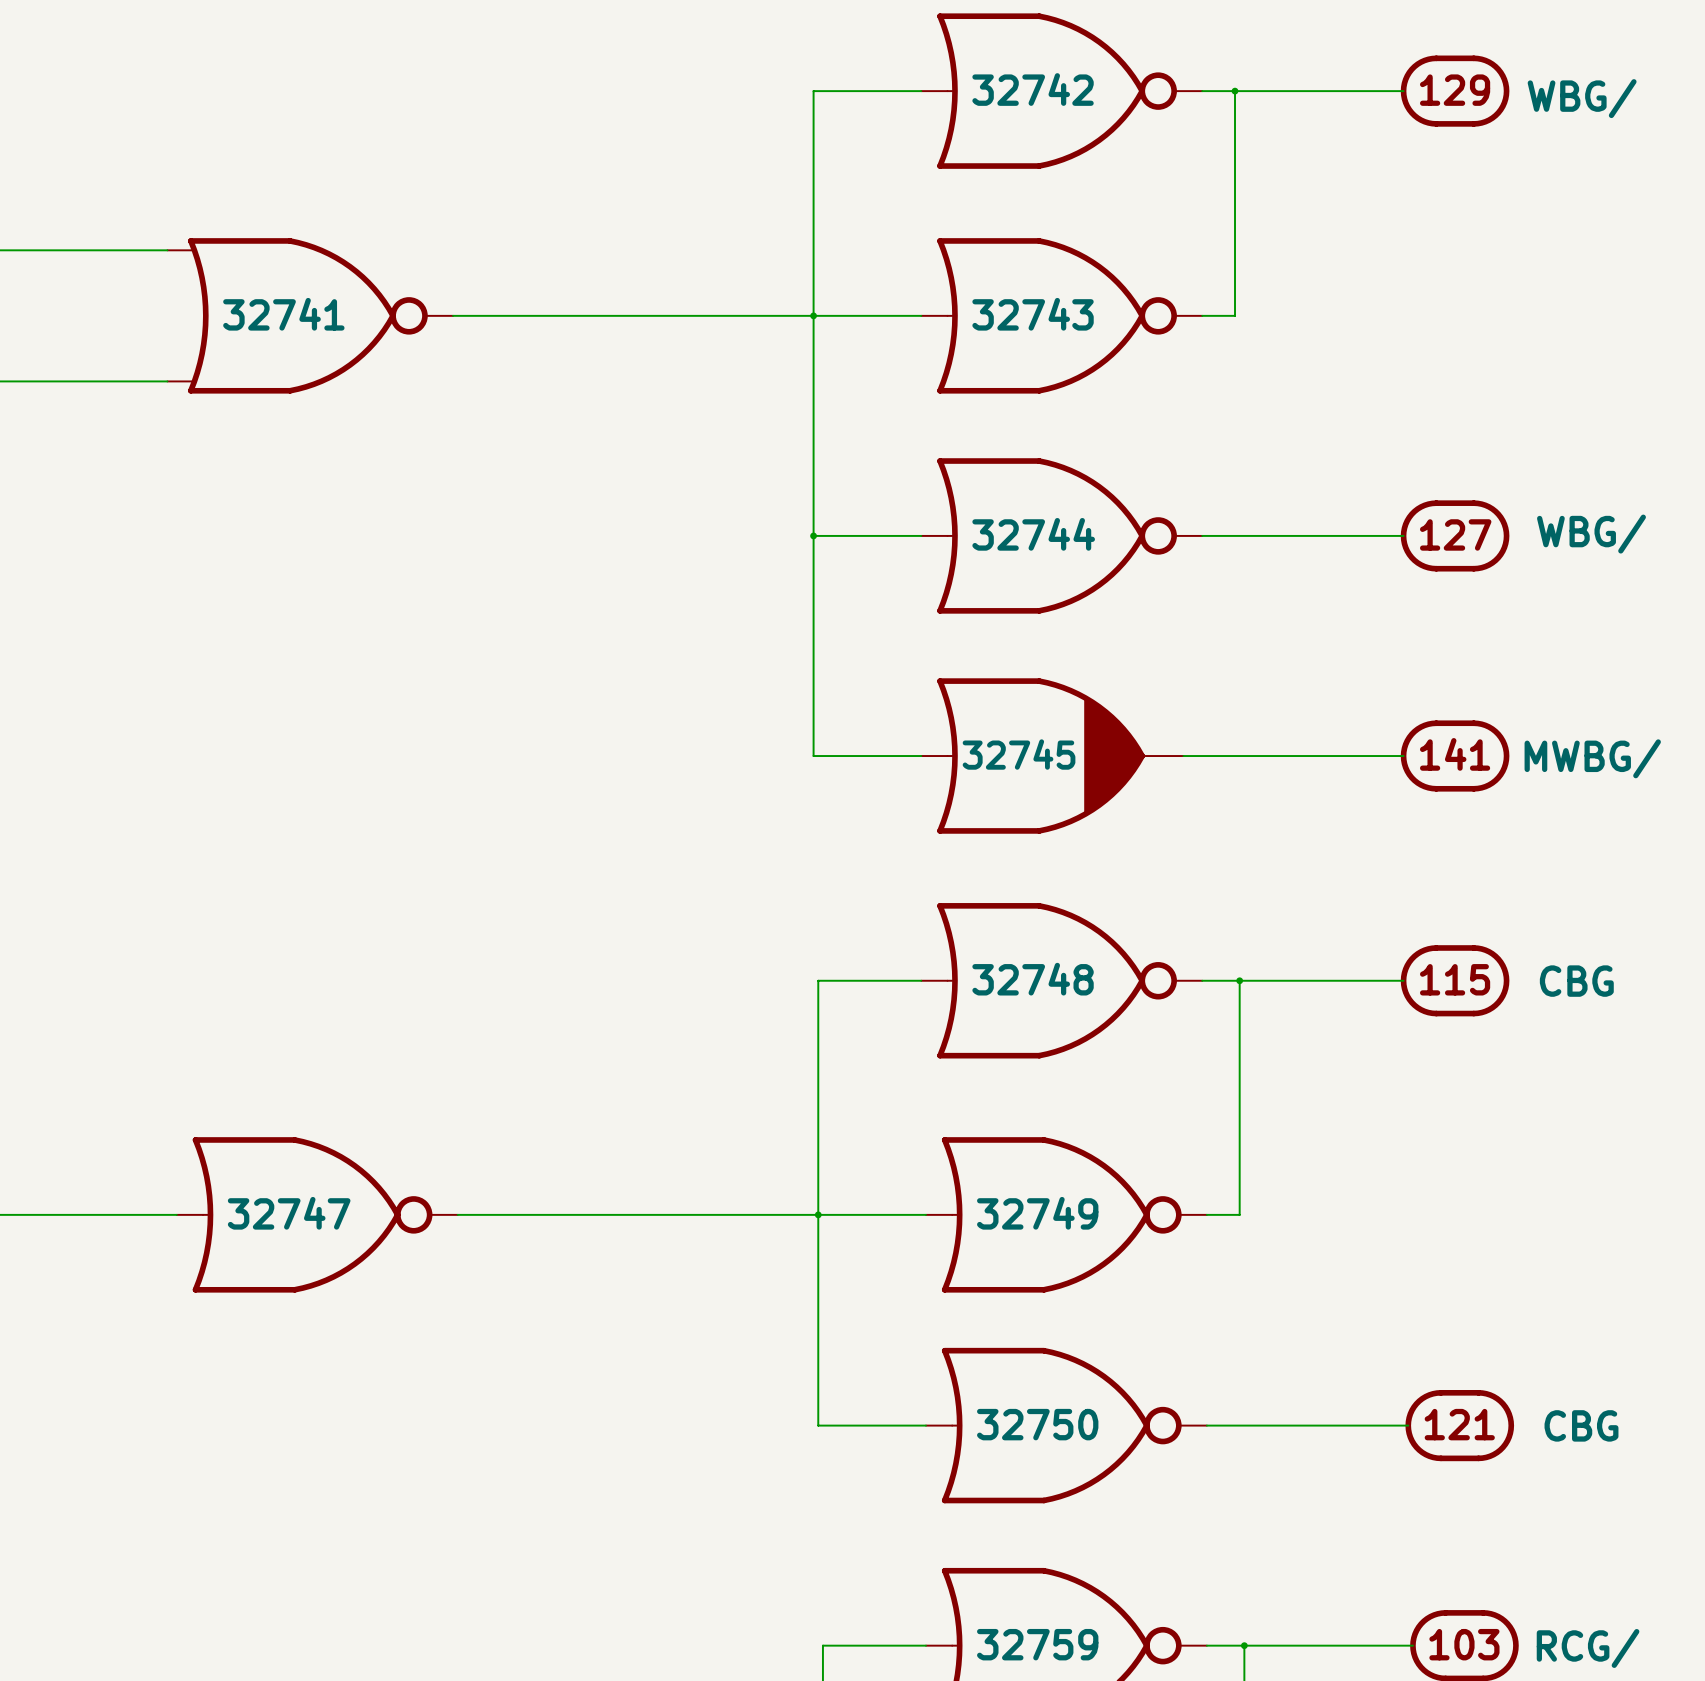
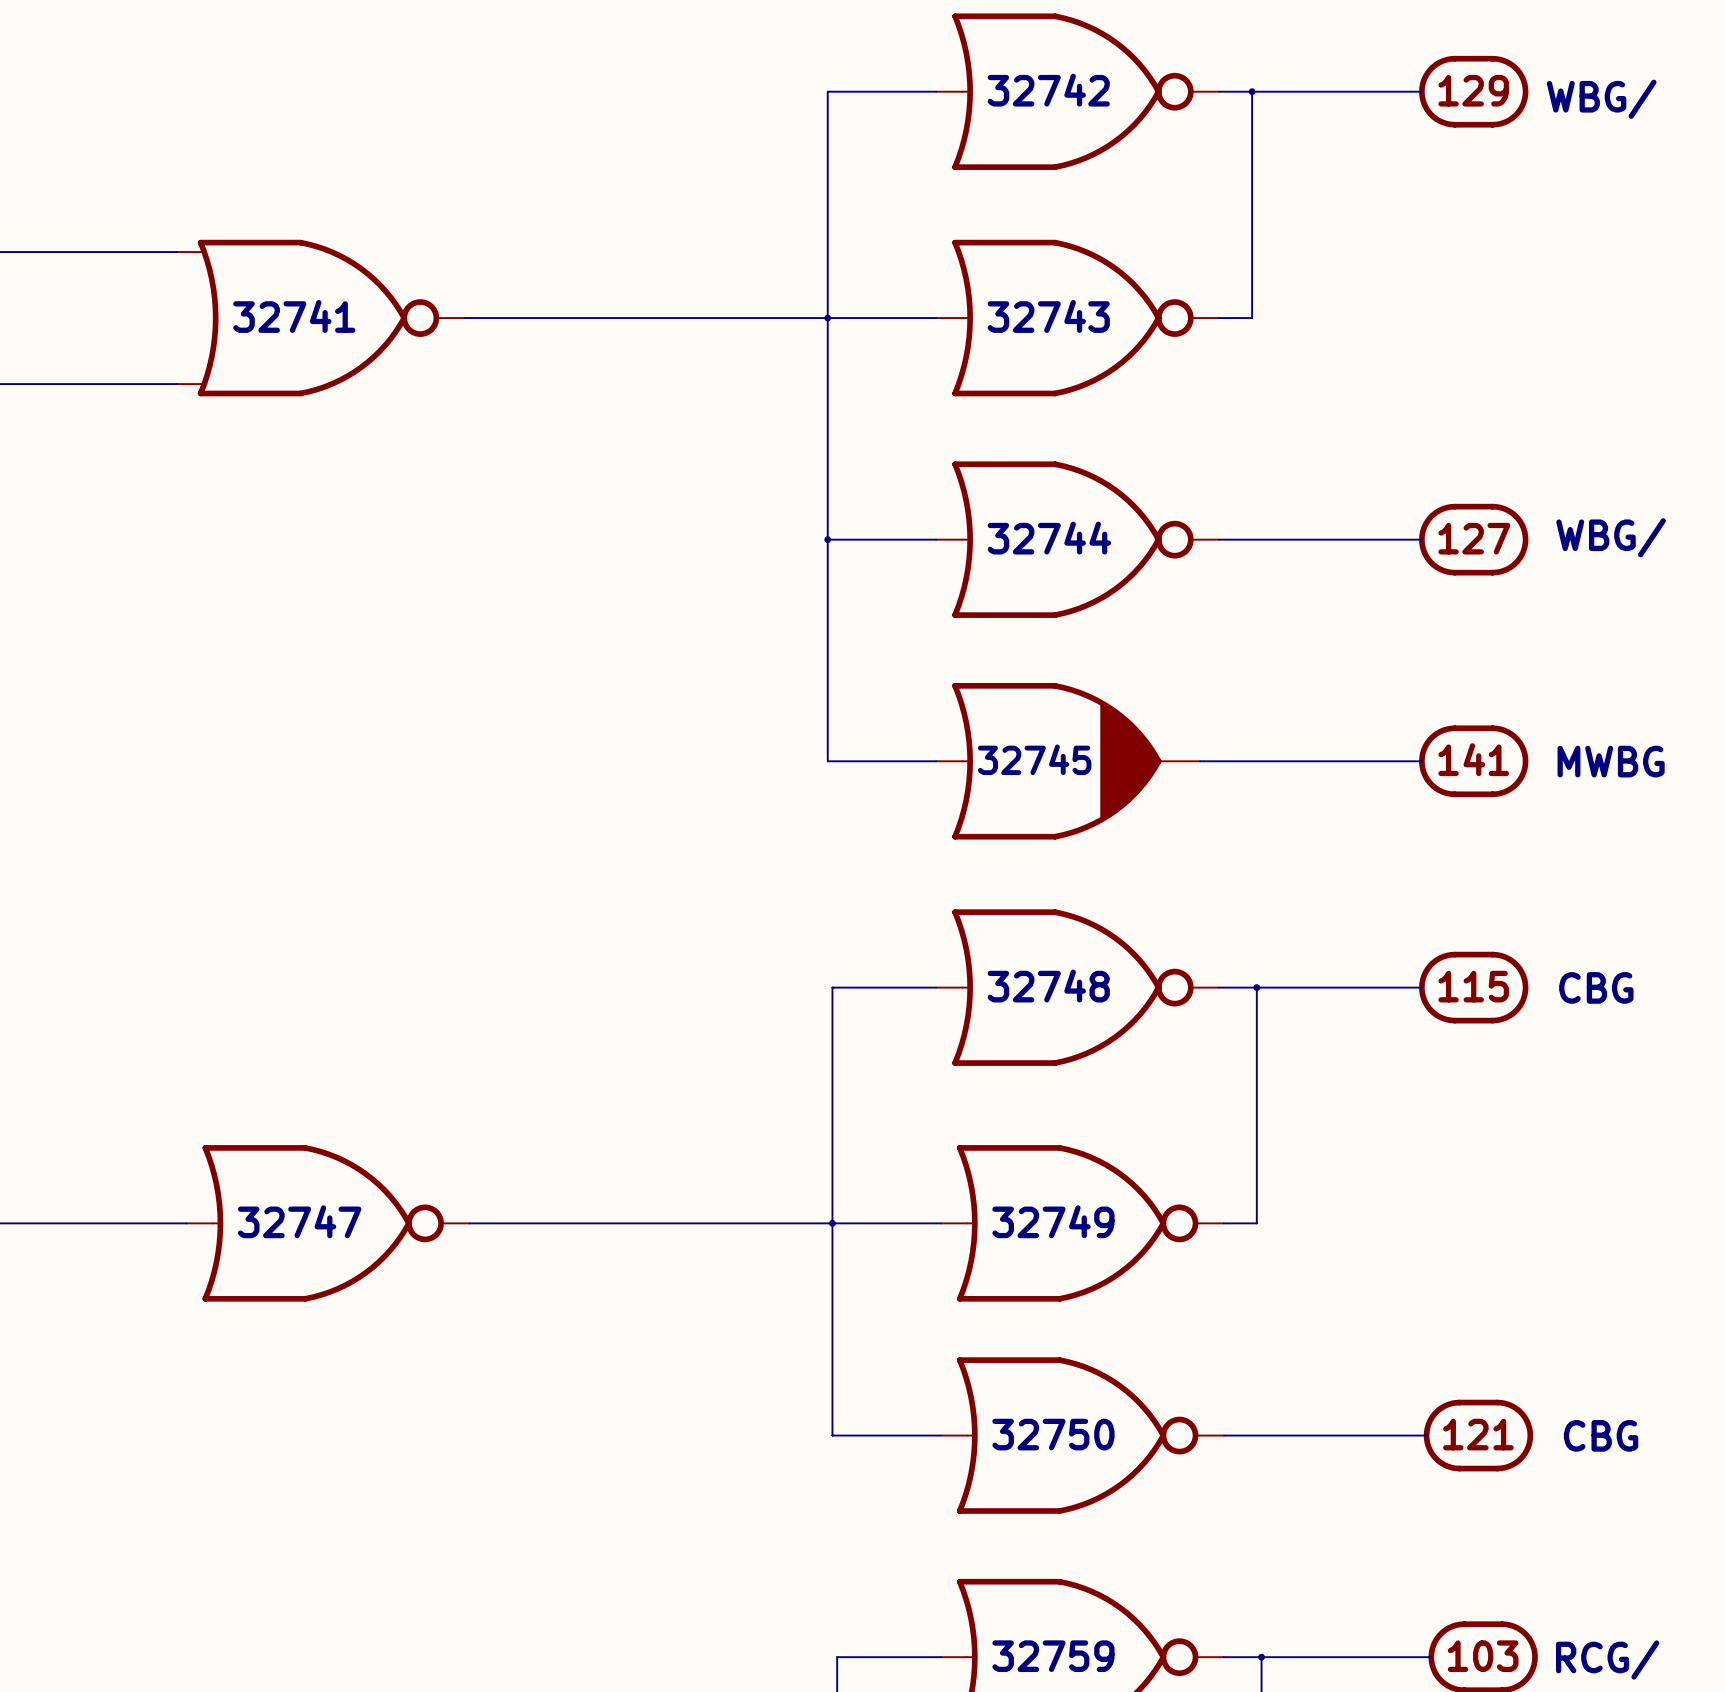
part text: MWBG/ (1592, 758) -> MWBG (1611, 761)

